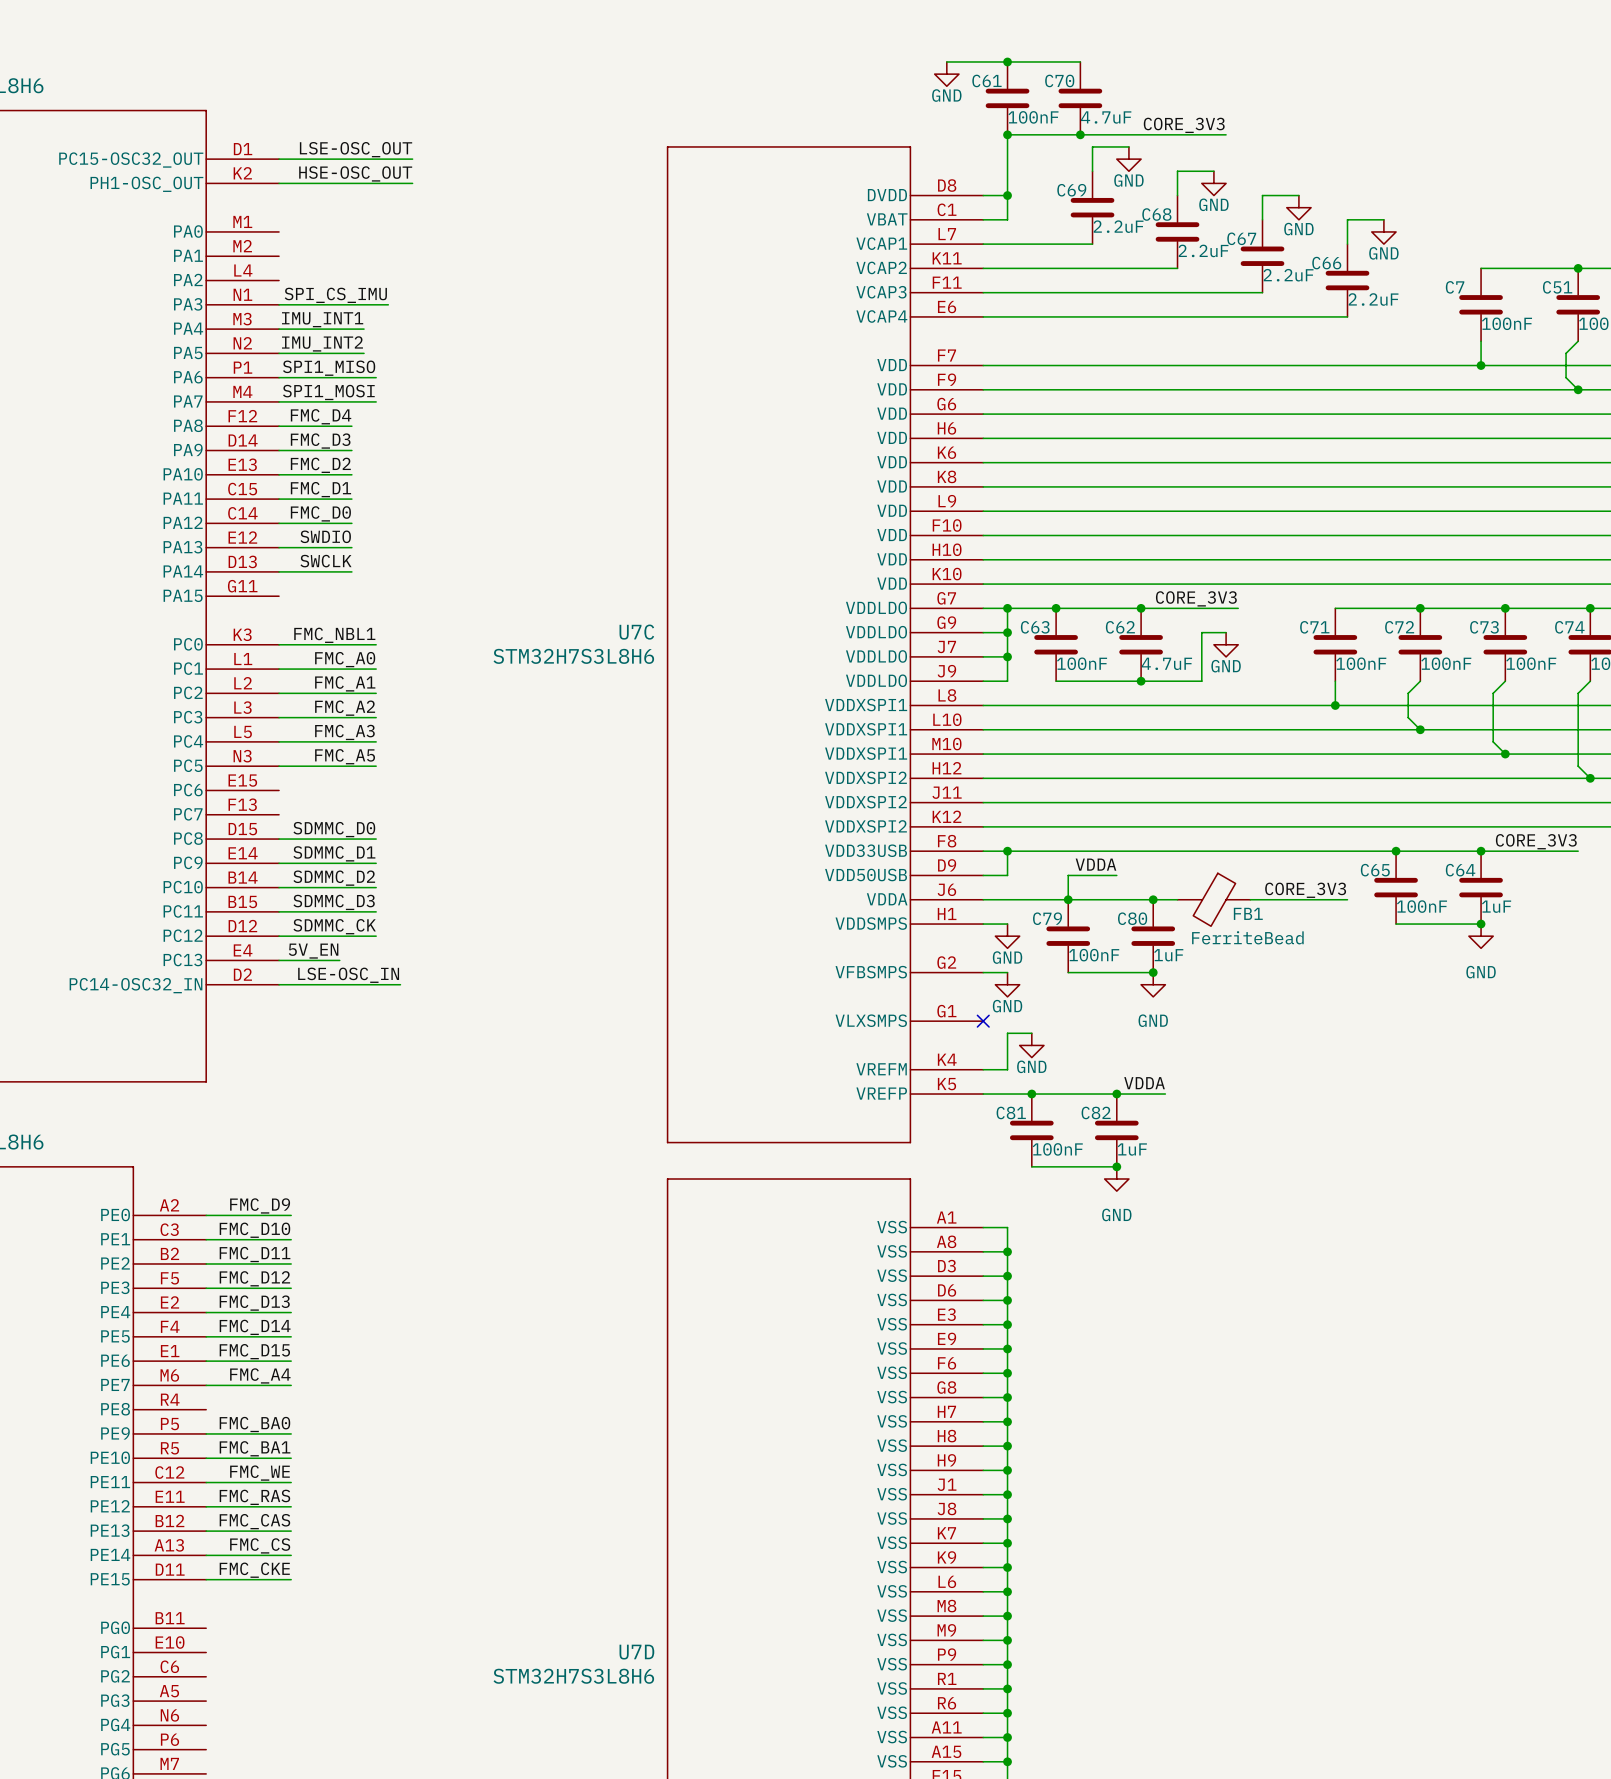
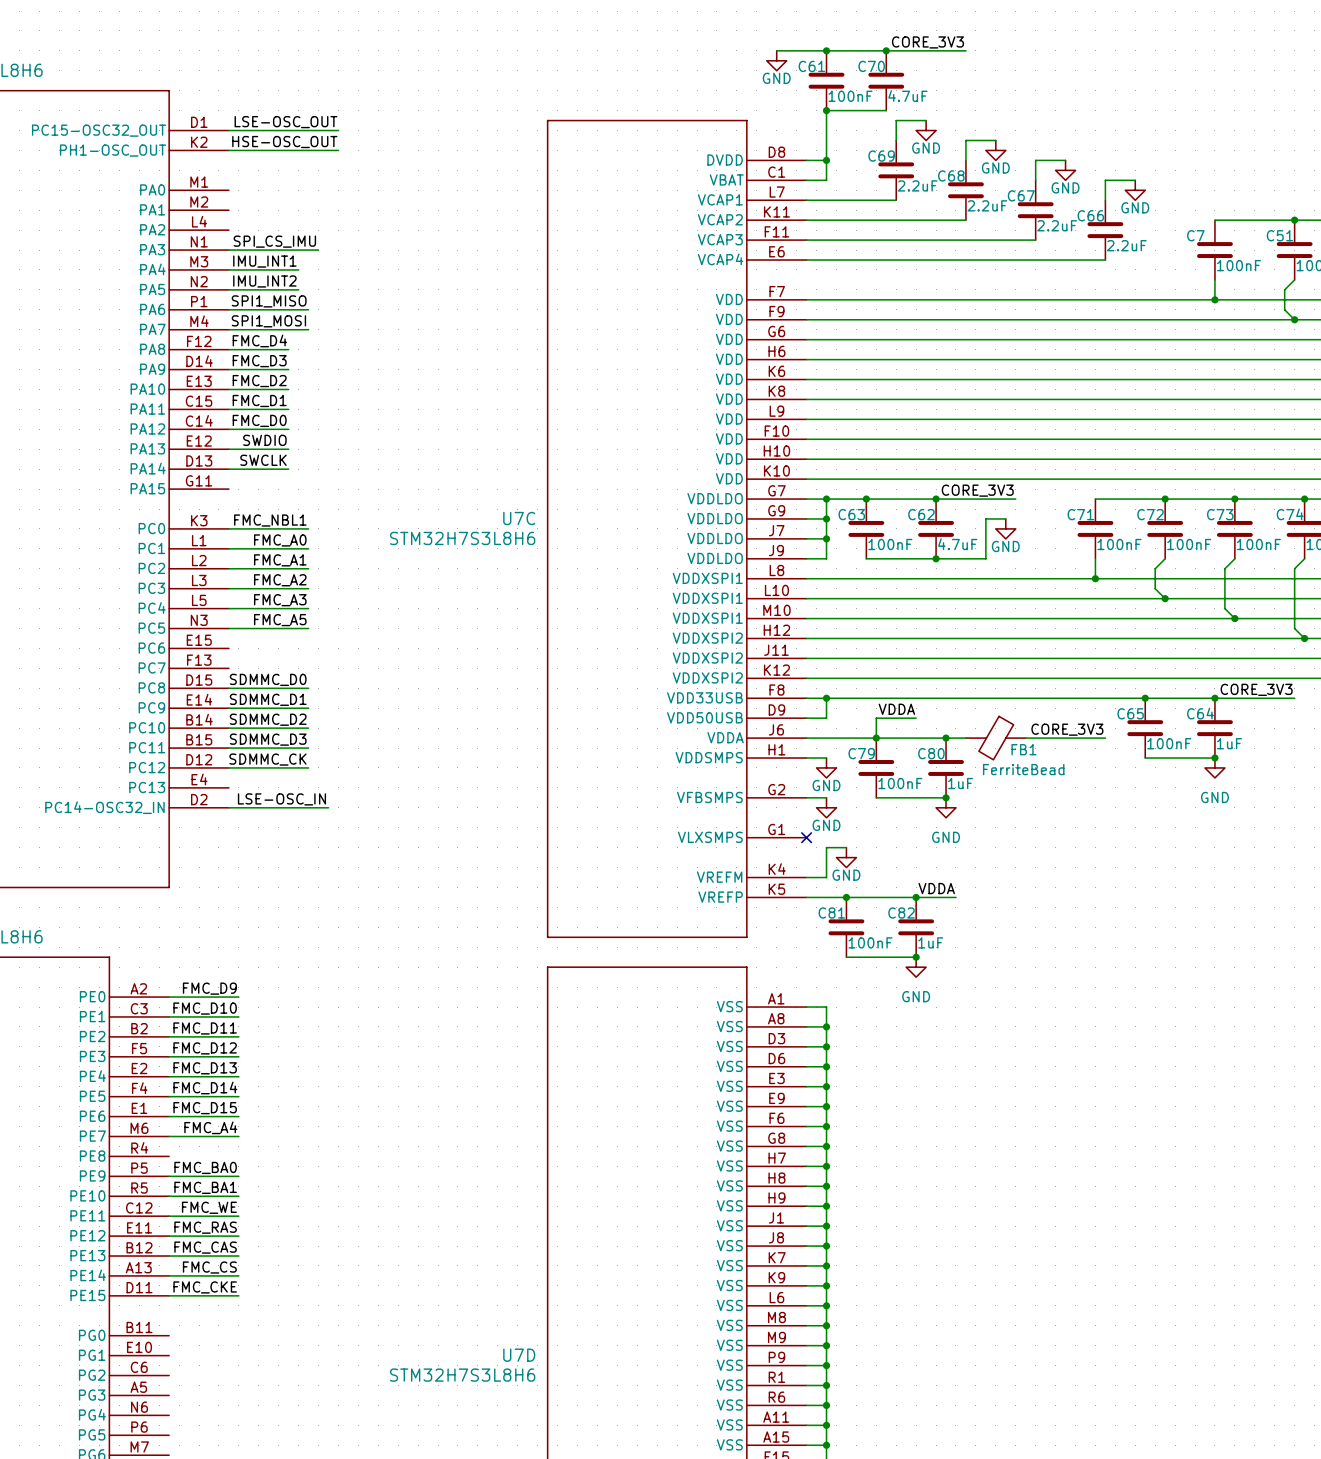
wire: none -> (886, 50) (965, 50)
junction: none -> (886, 50)
label position: CORE_3V3 (1184, 125) -> CORE_3V3 (927, 42)
wire: (1080, 134) (1226, 134) -> none
junction: (1080, 134) -> none
label: 5V_EN (313, 951) -> none
wire: (279, 960) (339, 960) -> none

